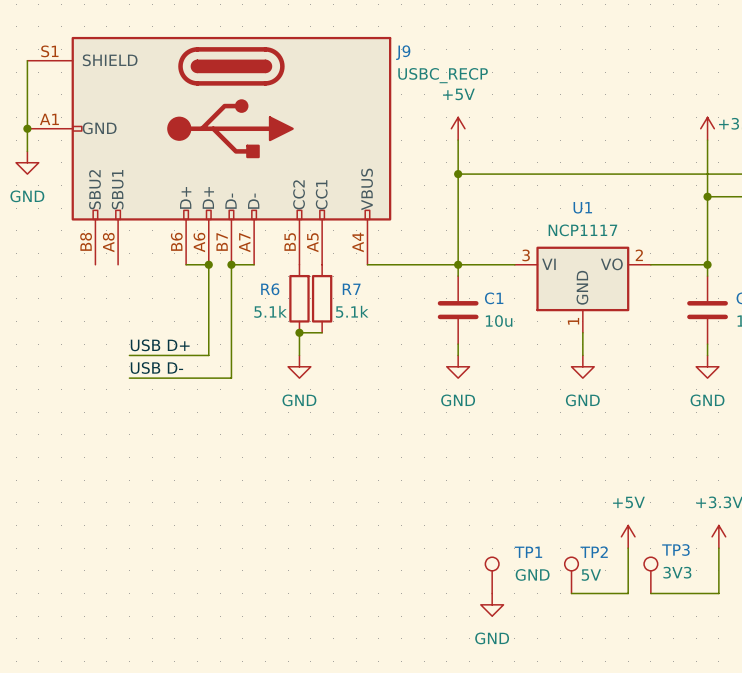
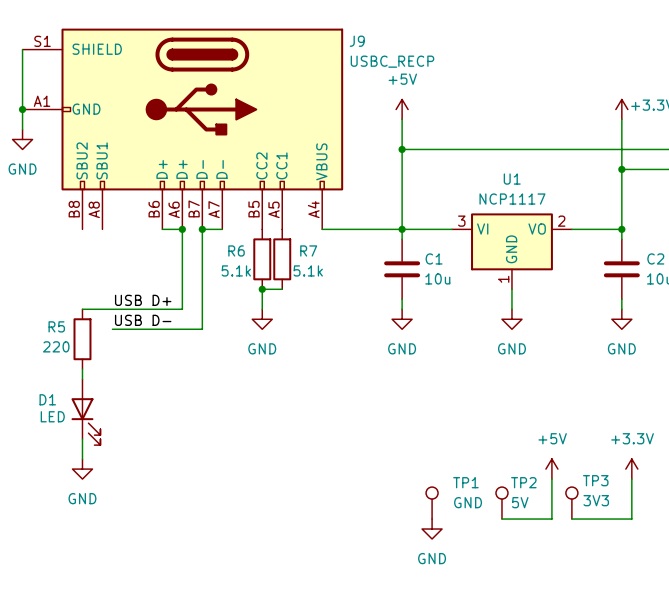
wire: none -> (82, 309) (112, 309)
R5: none -> 220 (82, 339)
wire: none -> (82, 369) (82, 379)
D1: none -> LED (85, 412)
wire: none -> (82, 439) (82, 459)
power symbol: none -> GND (82, 469)

